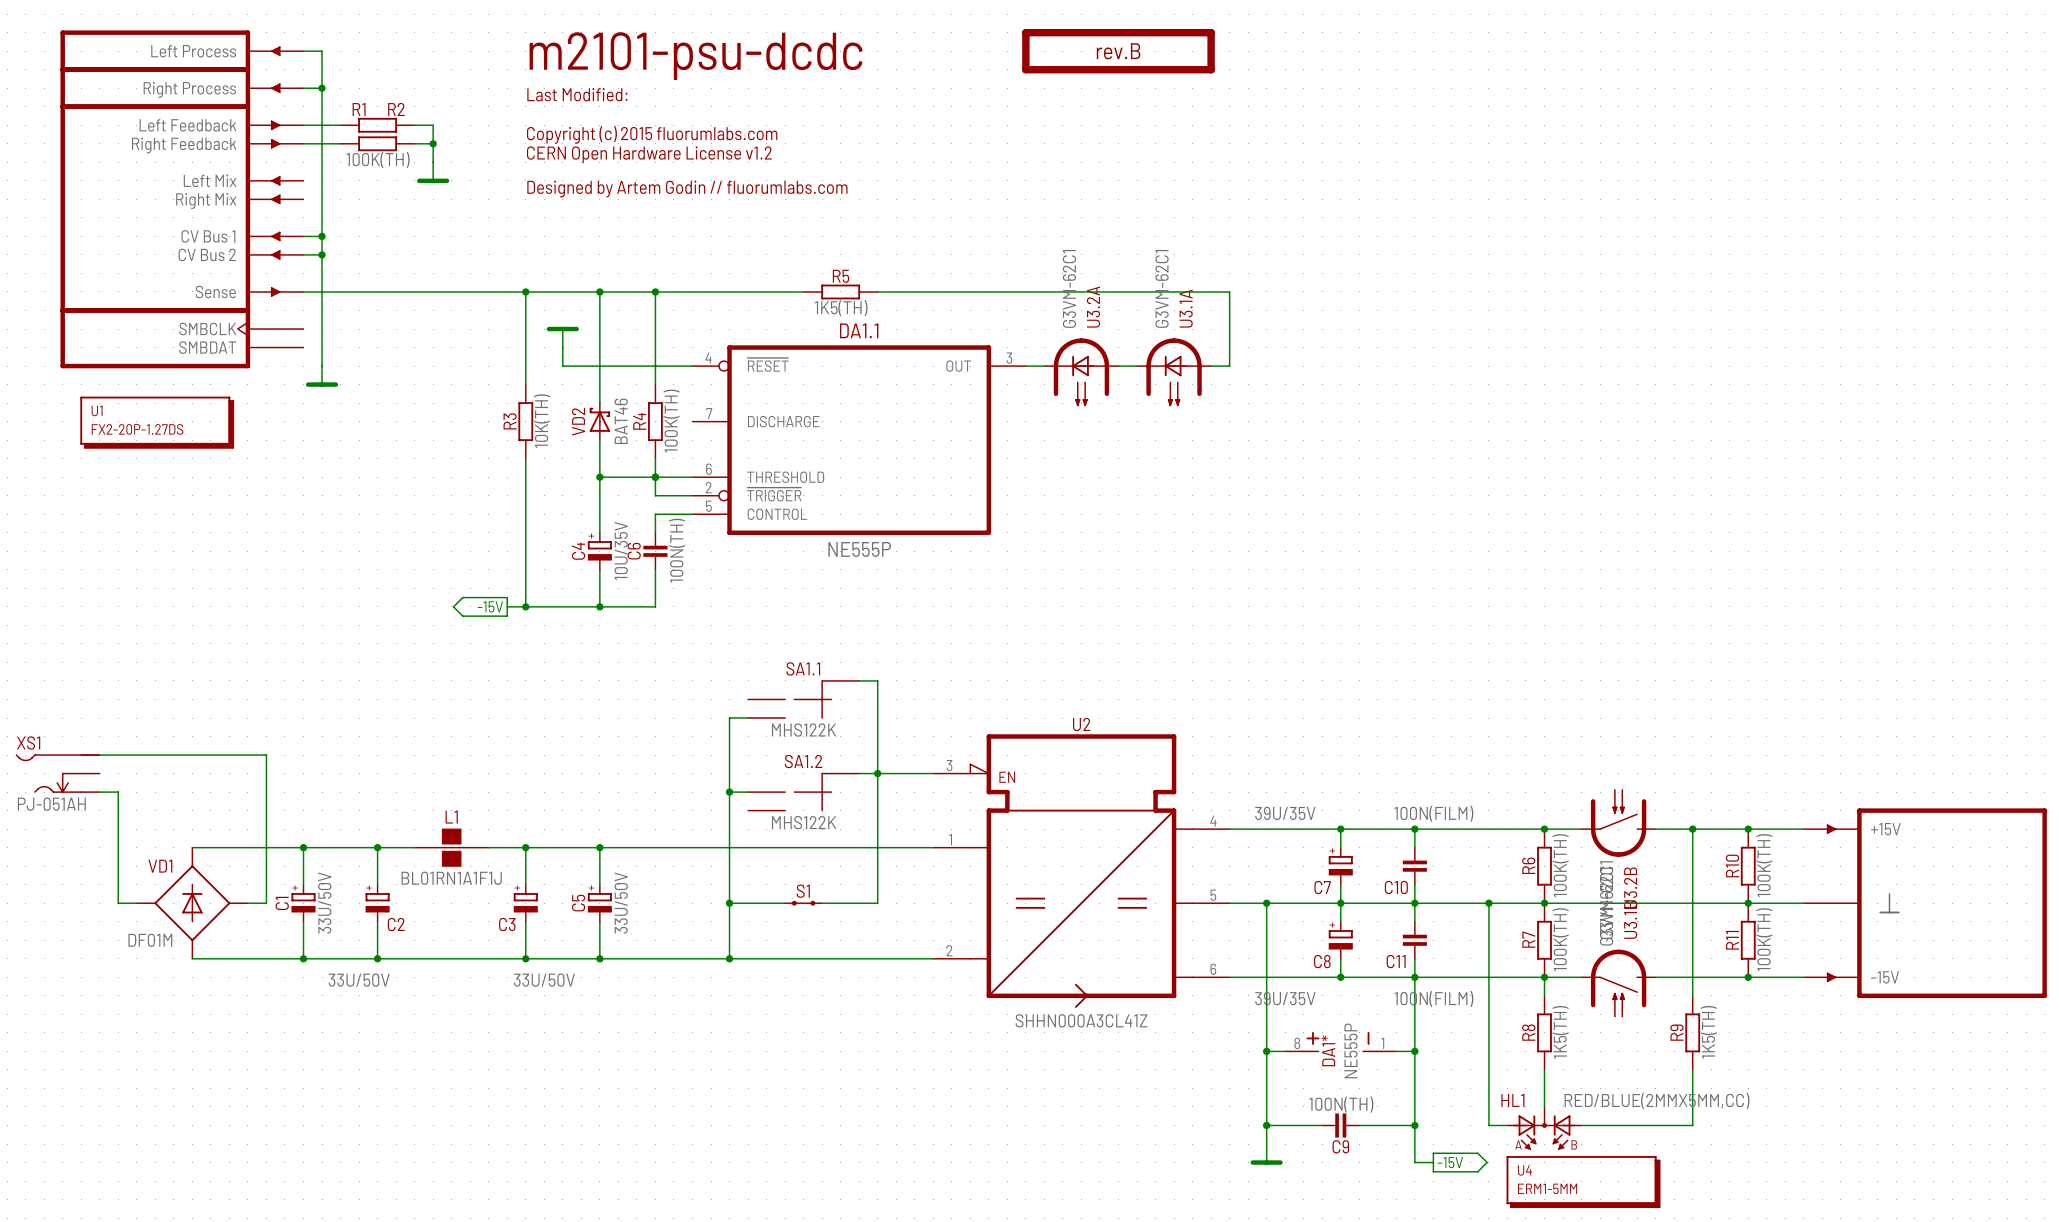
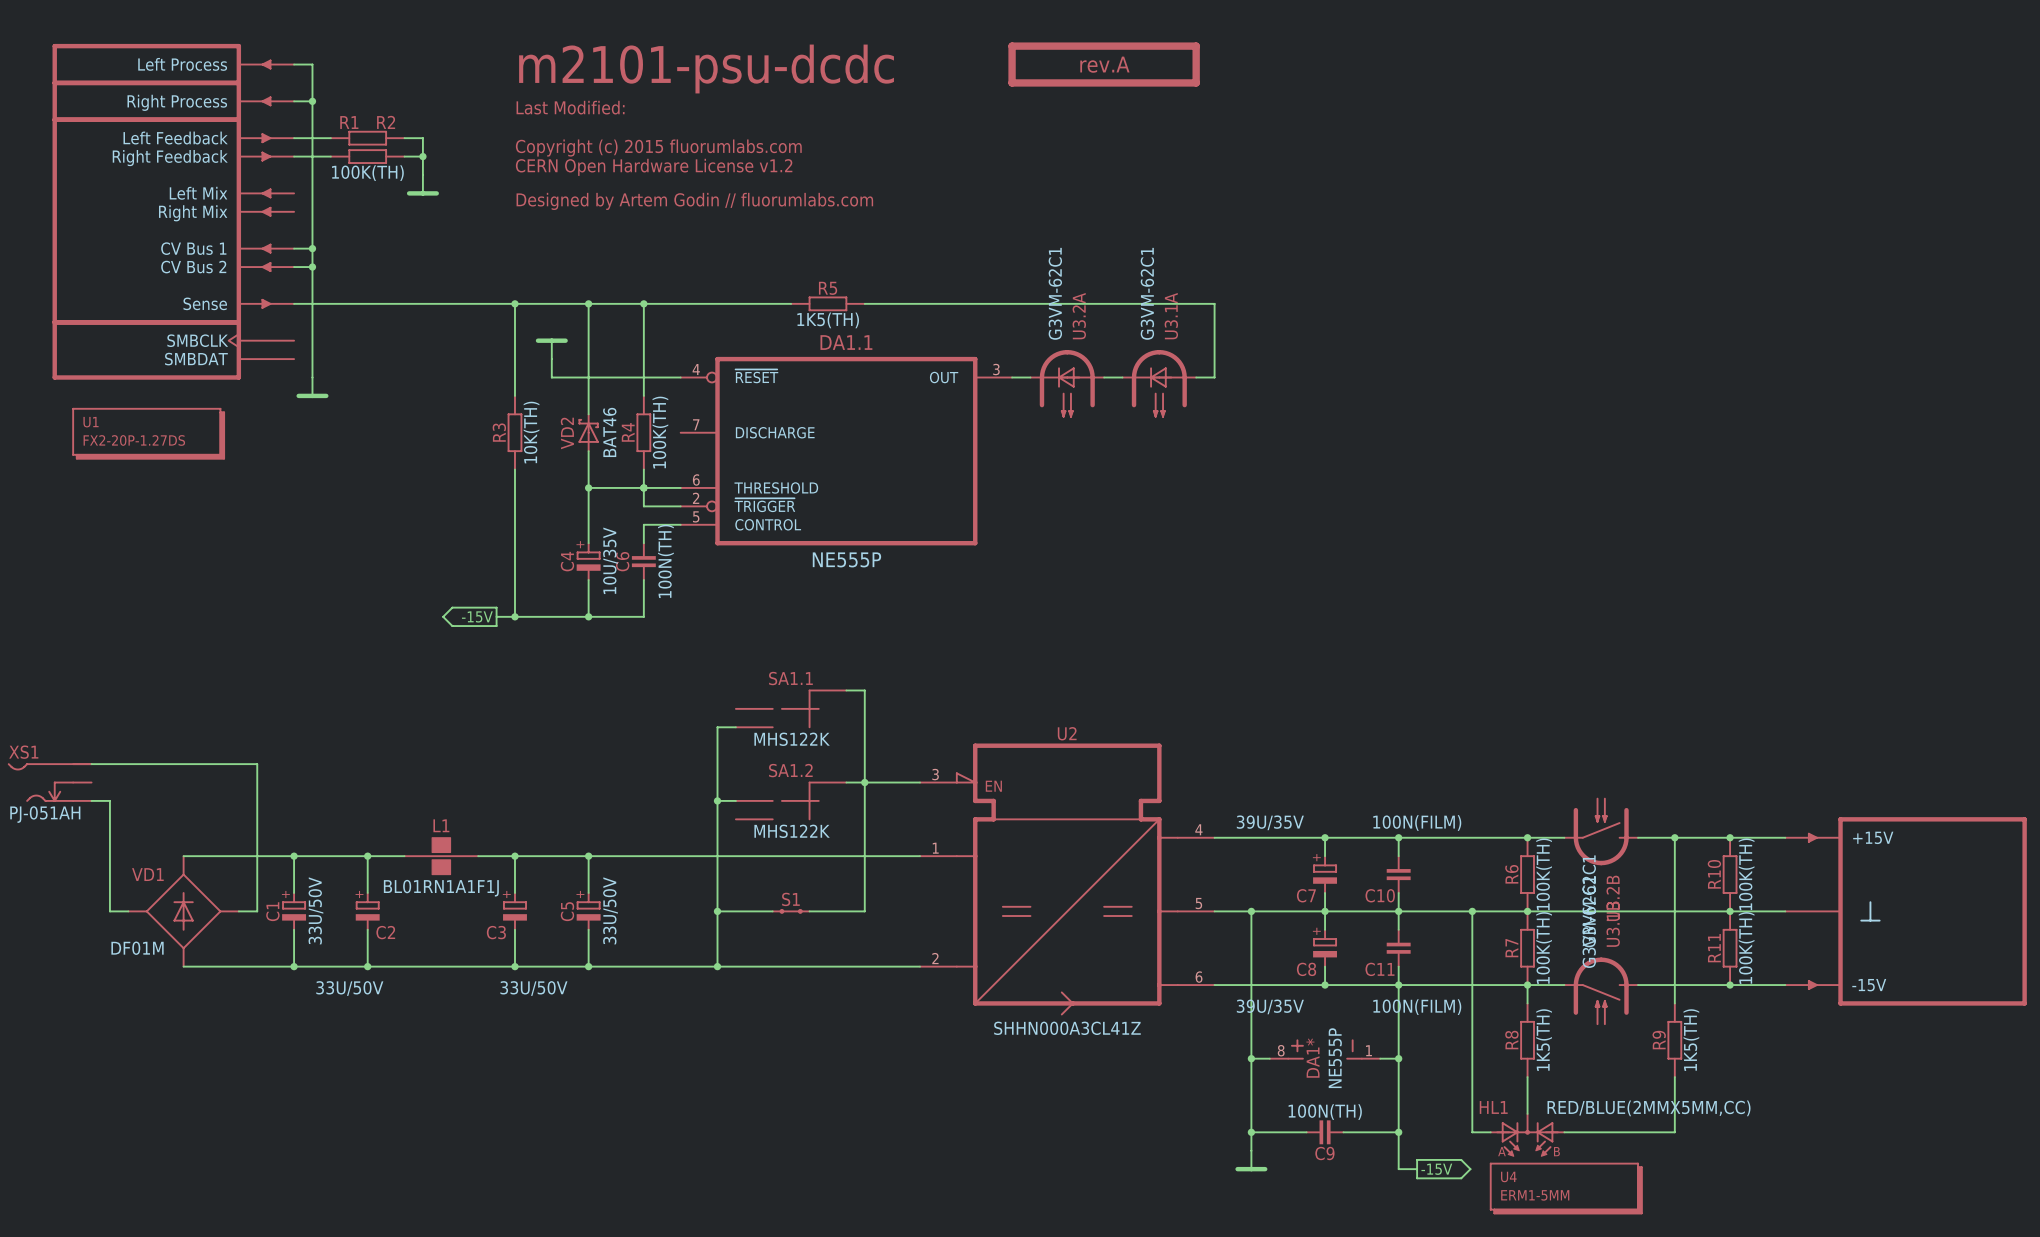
part value: rev.B (1118, 51) -> rev.A (1104, 64)

